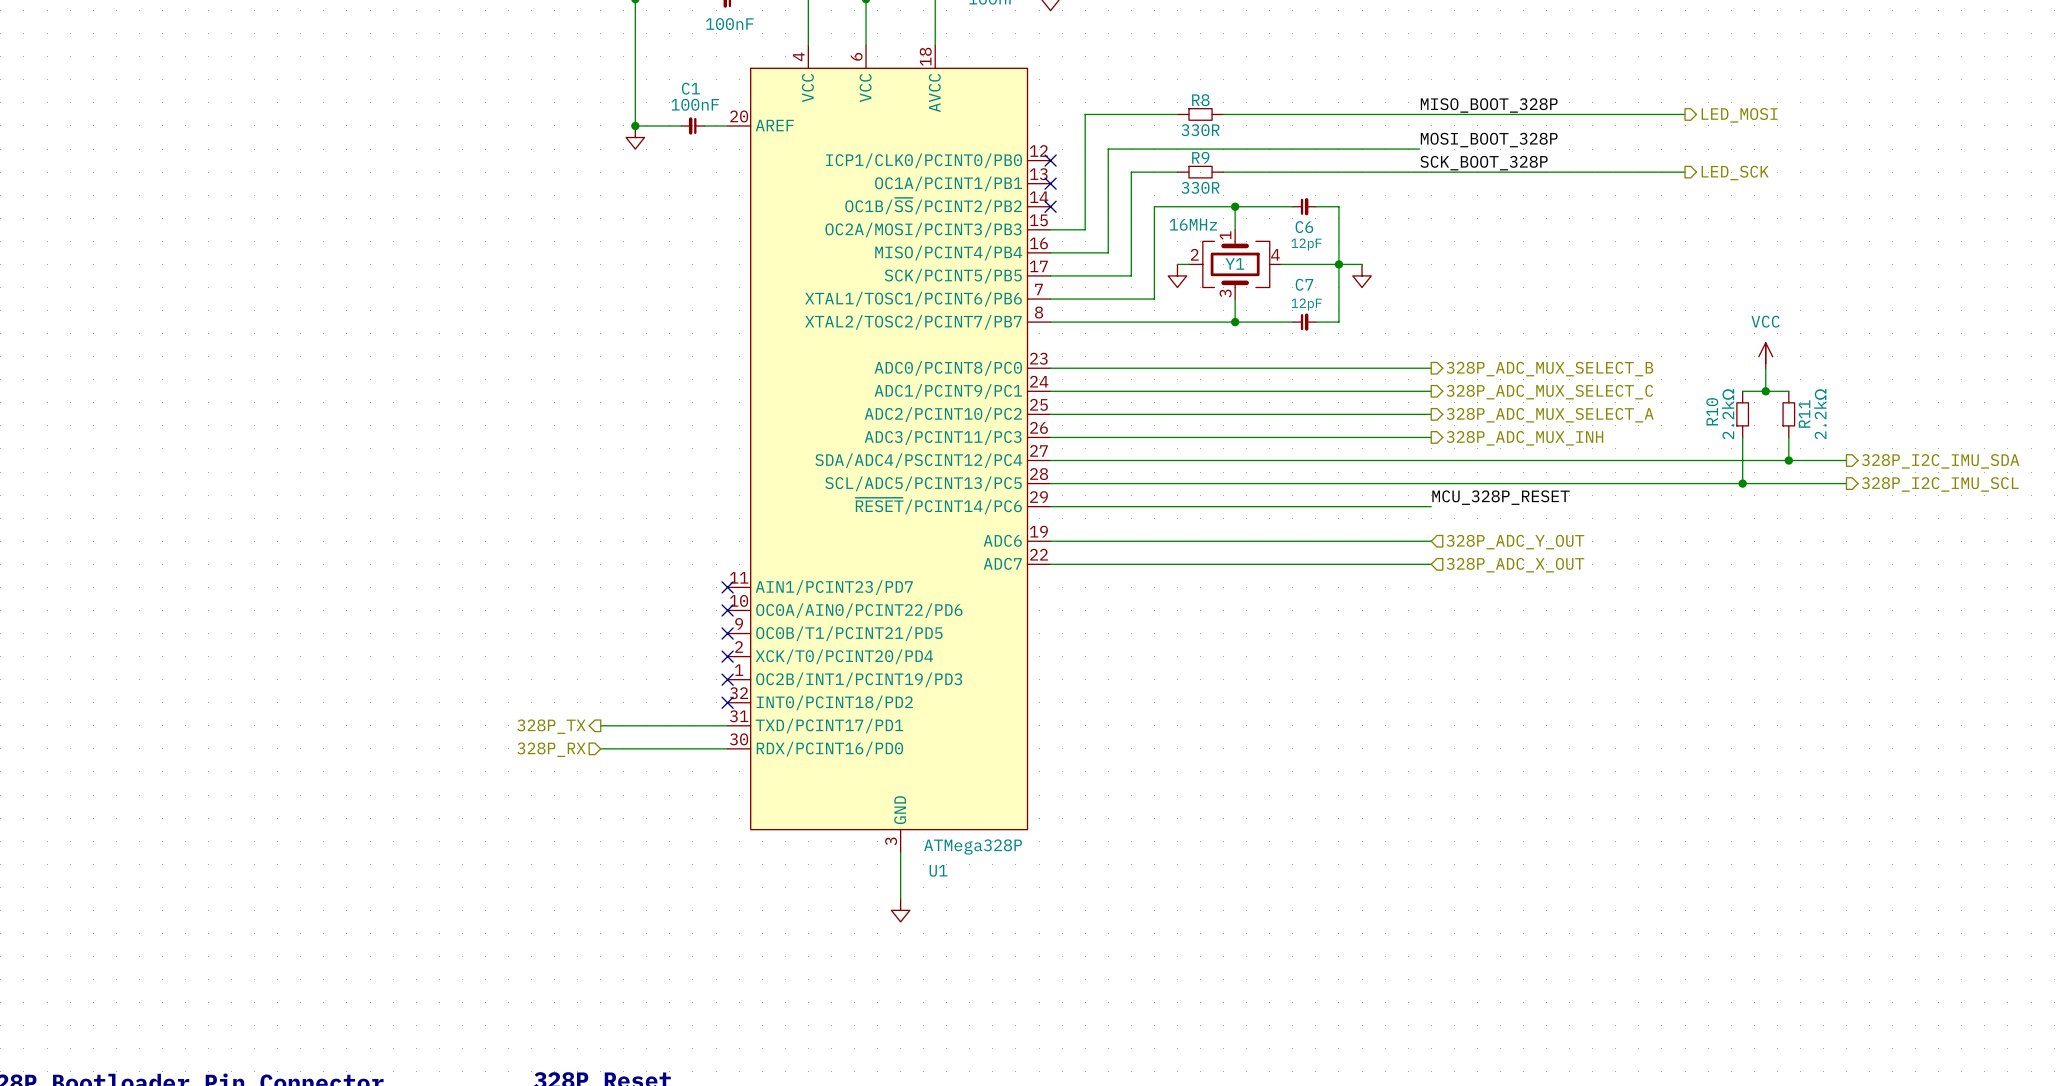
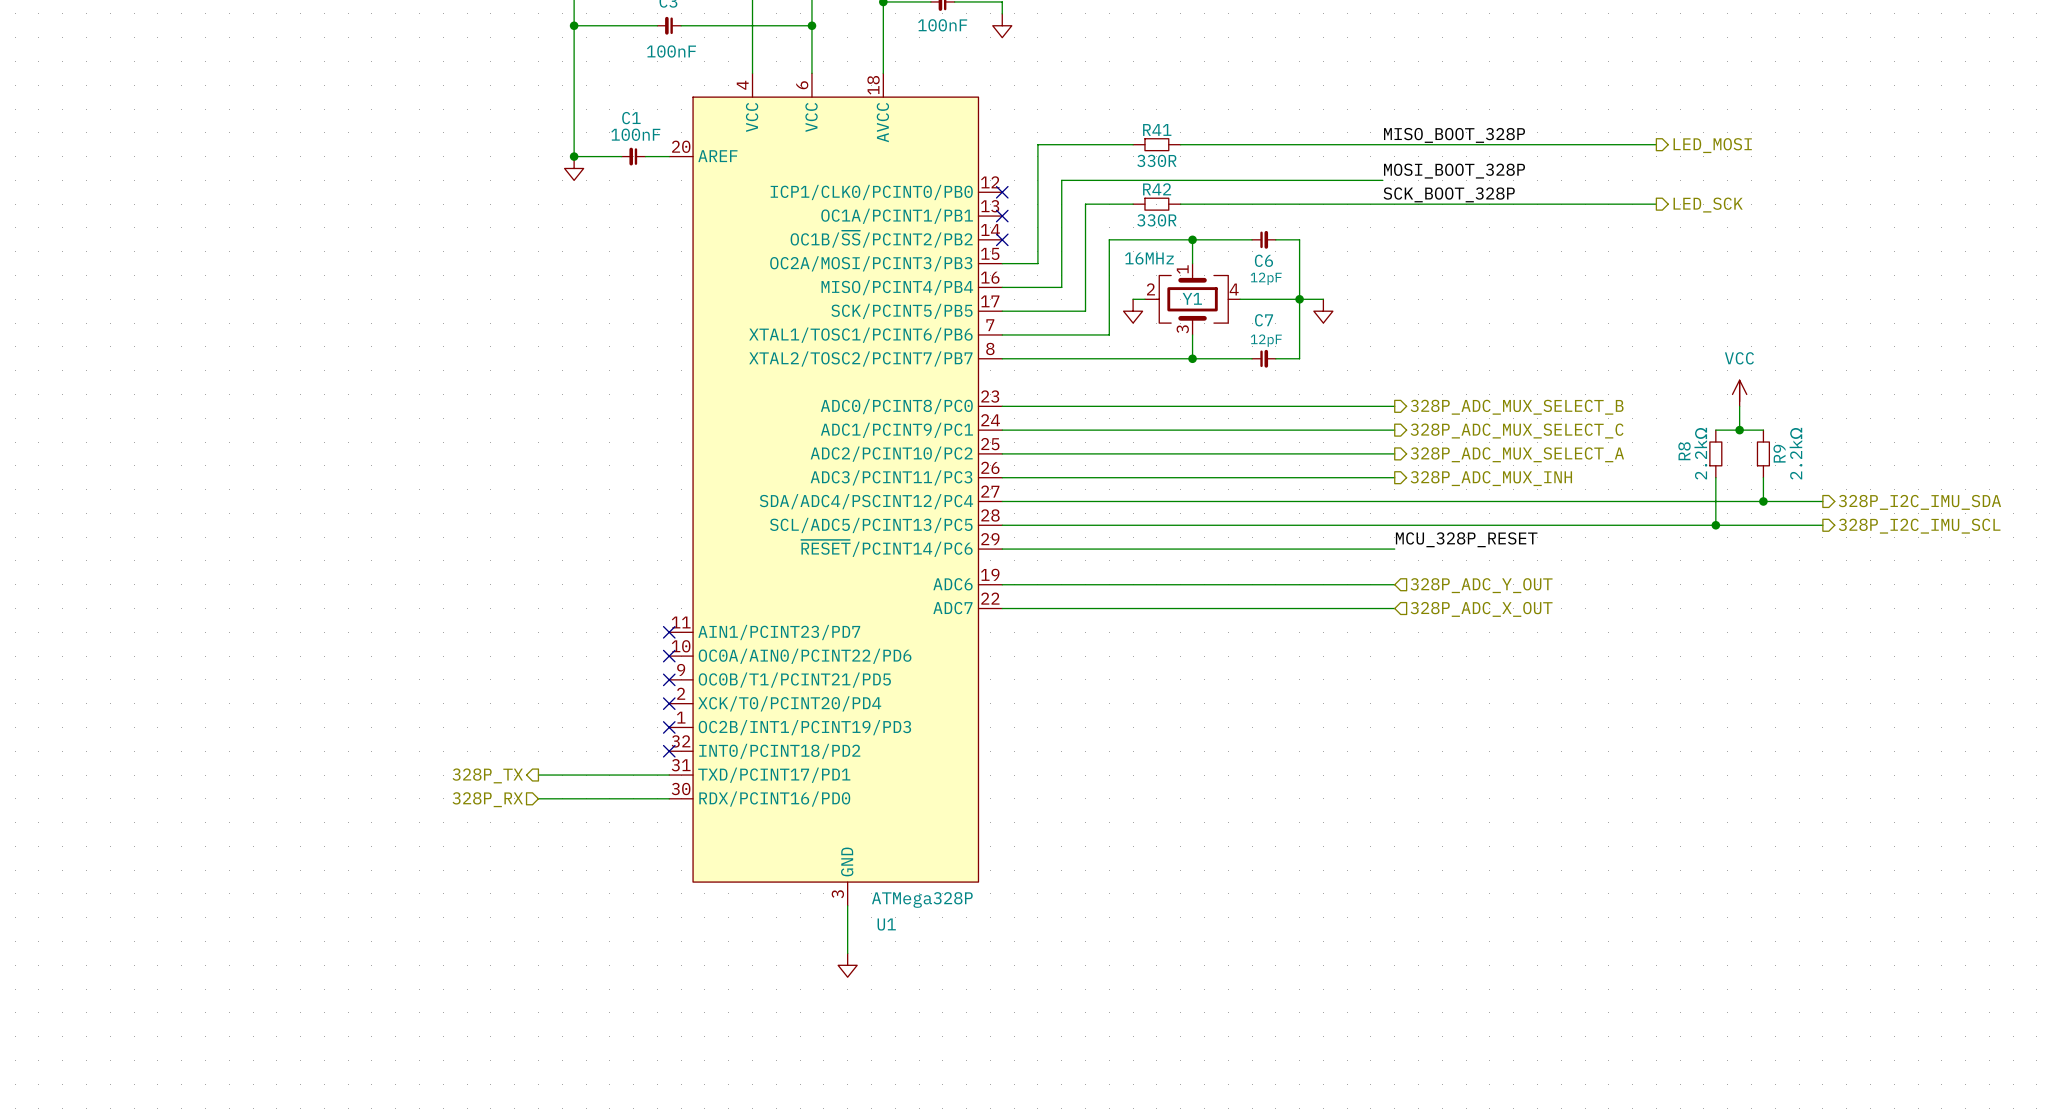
R8 name: R8 (1200, 100) -> R41 (1157, 129)
R9 name: R9 (1200, 157) -> R42 (1157, 189)
R10 name: R10 (1712, 411) -> R8 (1684, 451)
R11 name: R11 (1804, 414) -> R9 (1779, 453)

